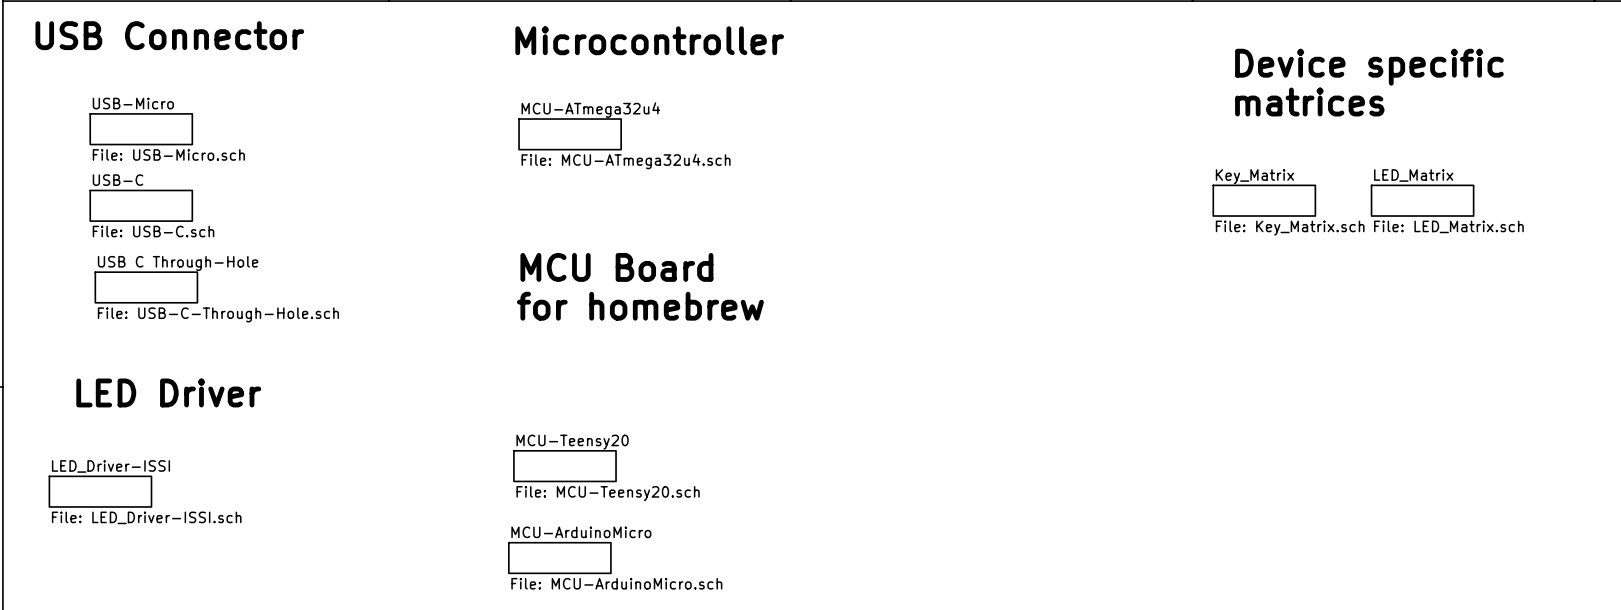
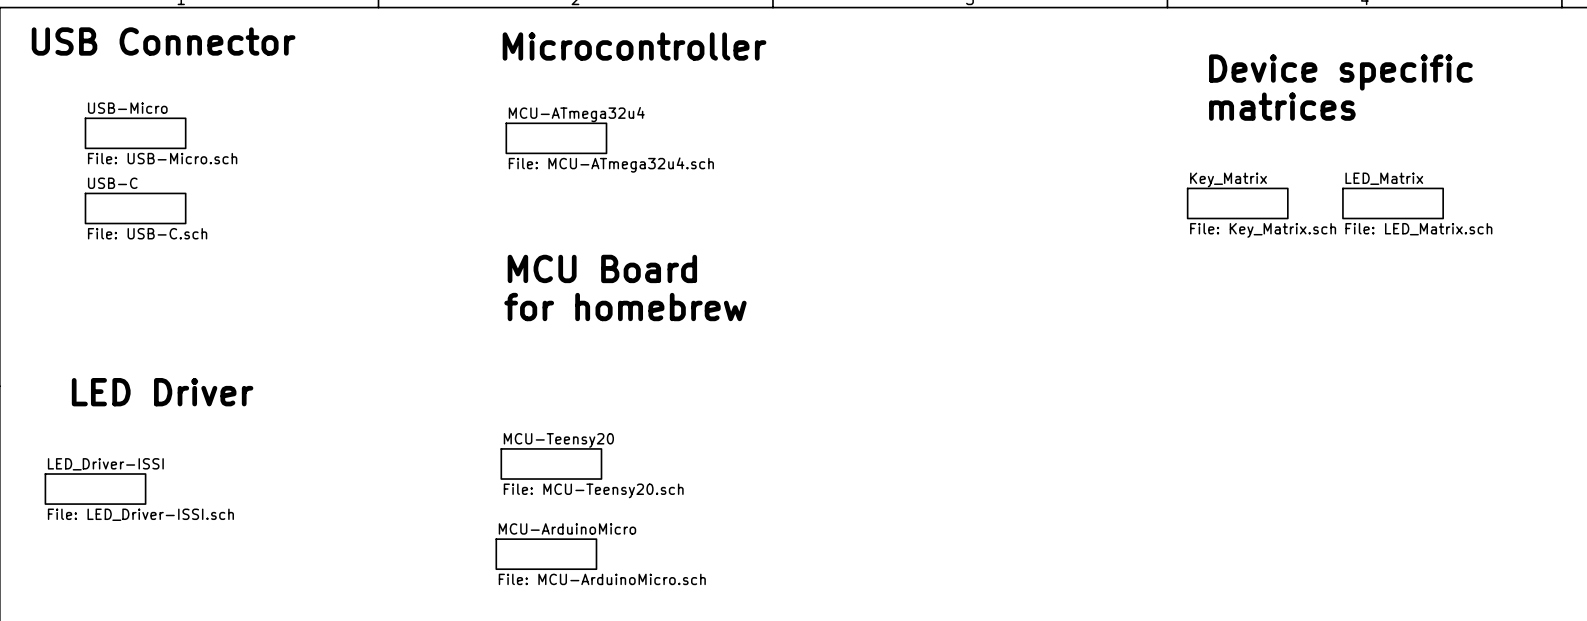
sheet USB C Through-Hole: File: USB-C-Through-Hole.sch (146, 287) -> none

